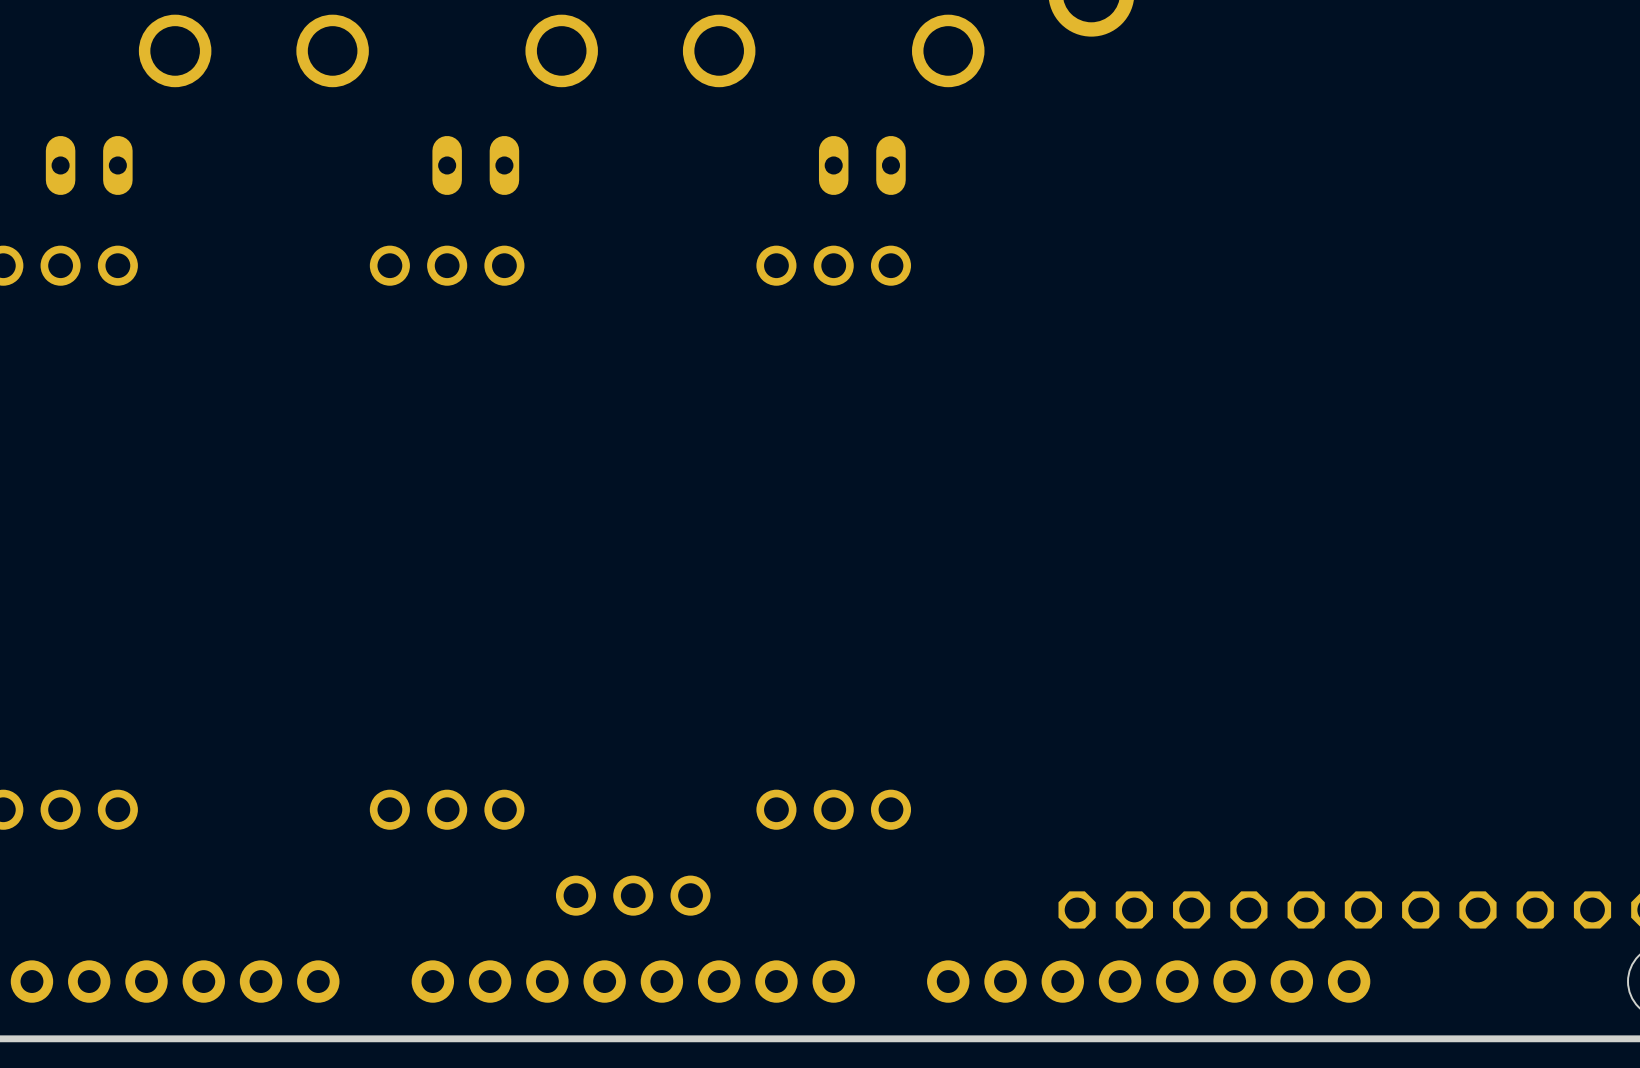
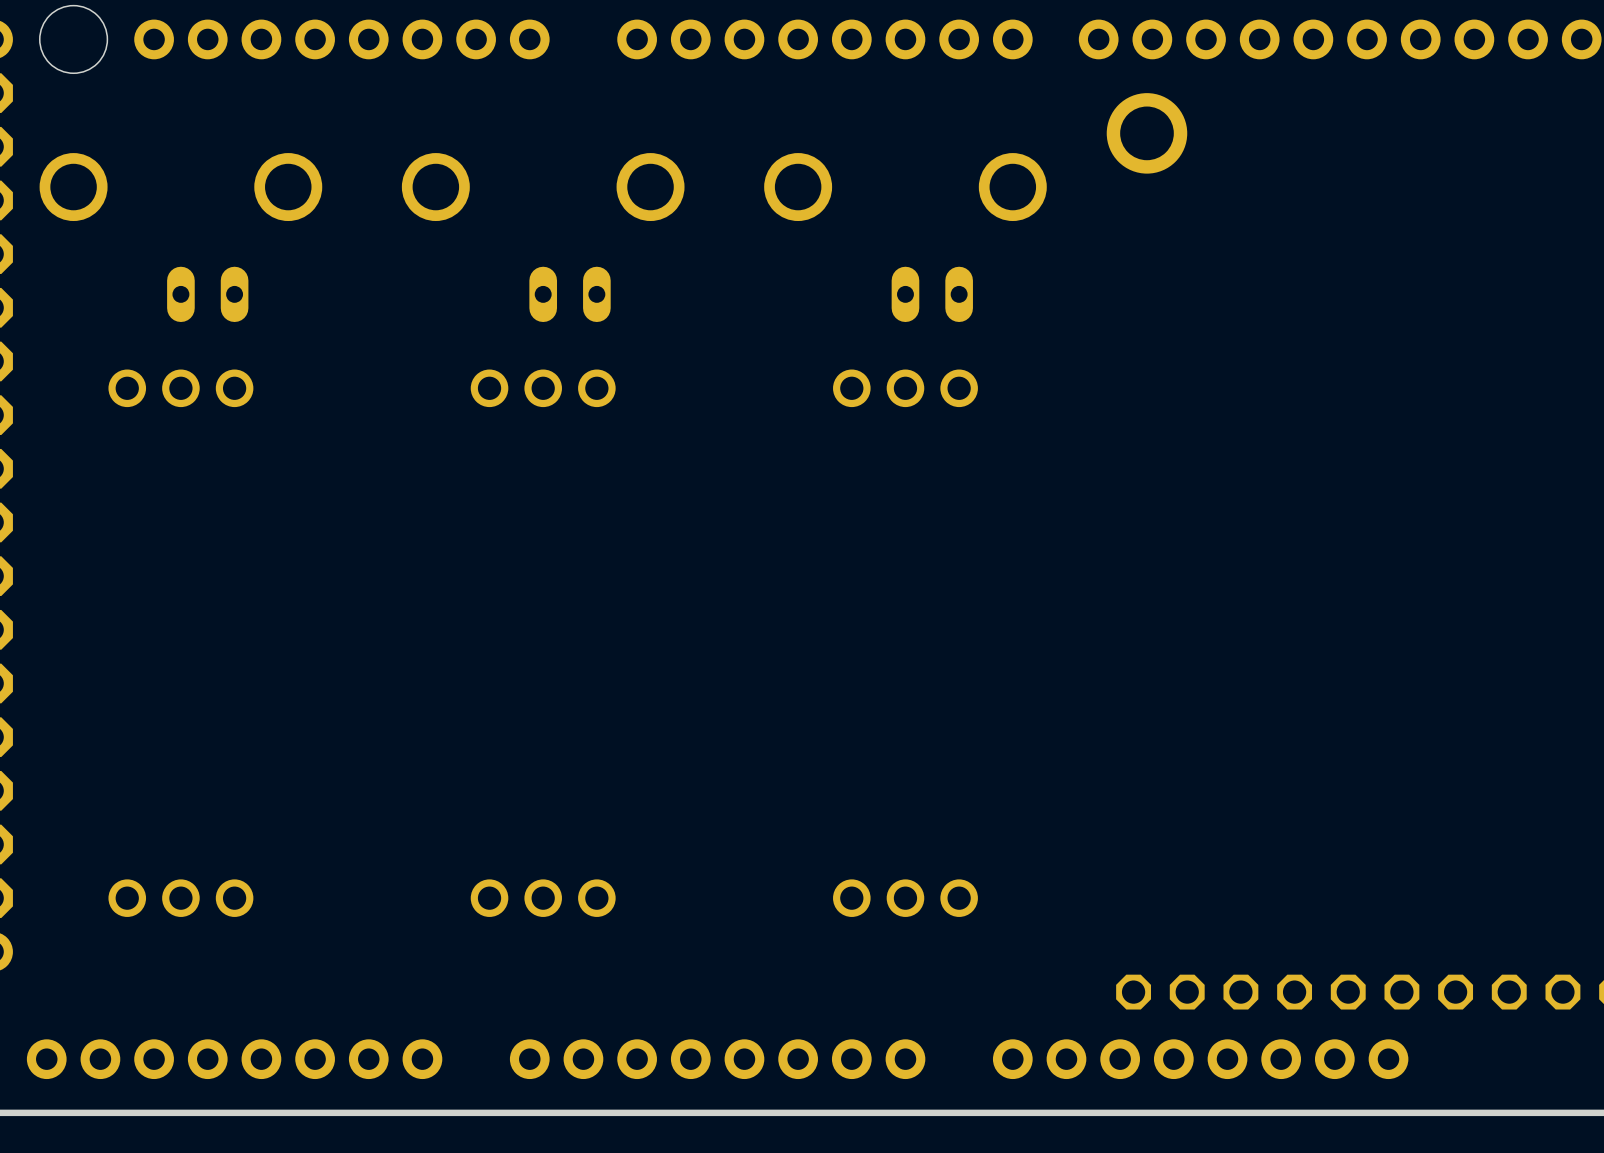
part: (633, 895) -> none

